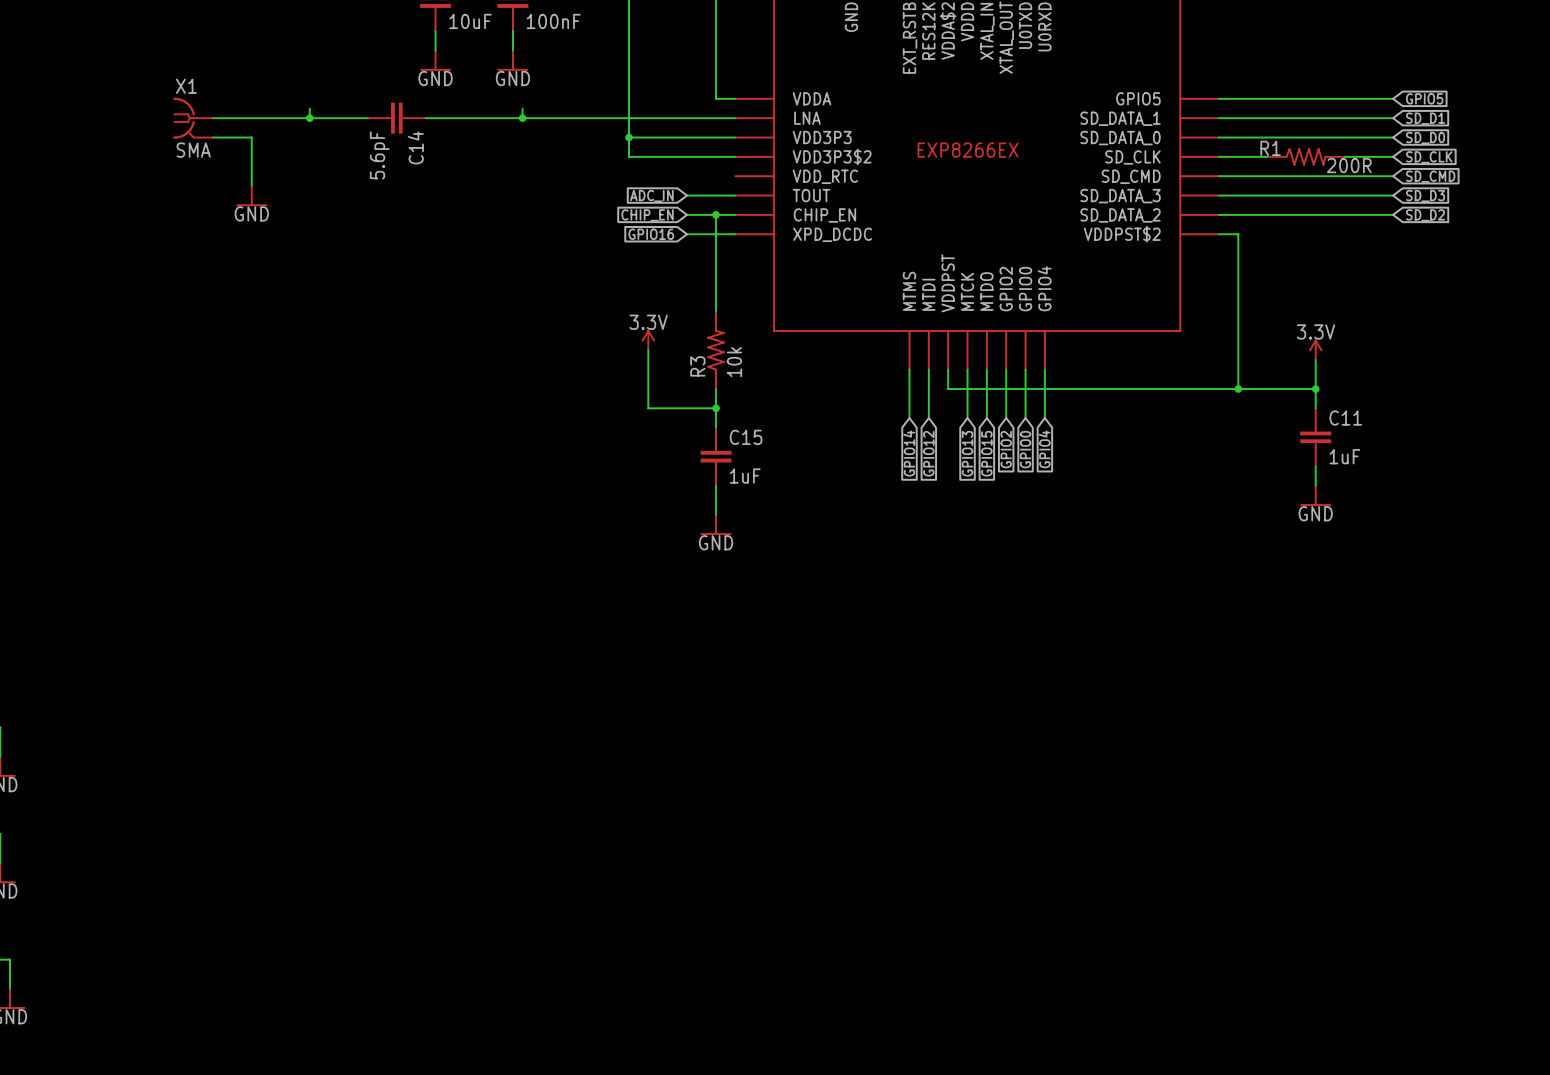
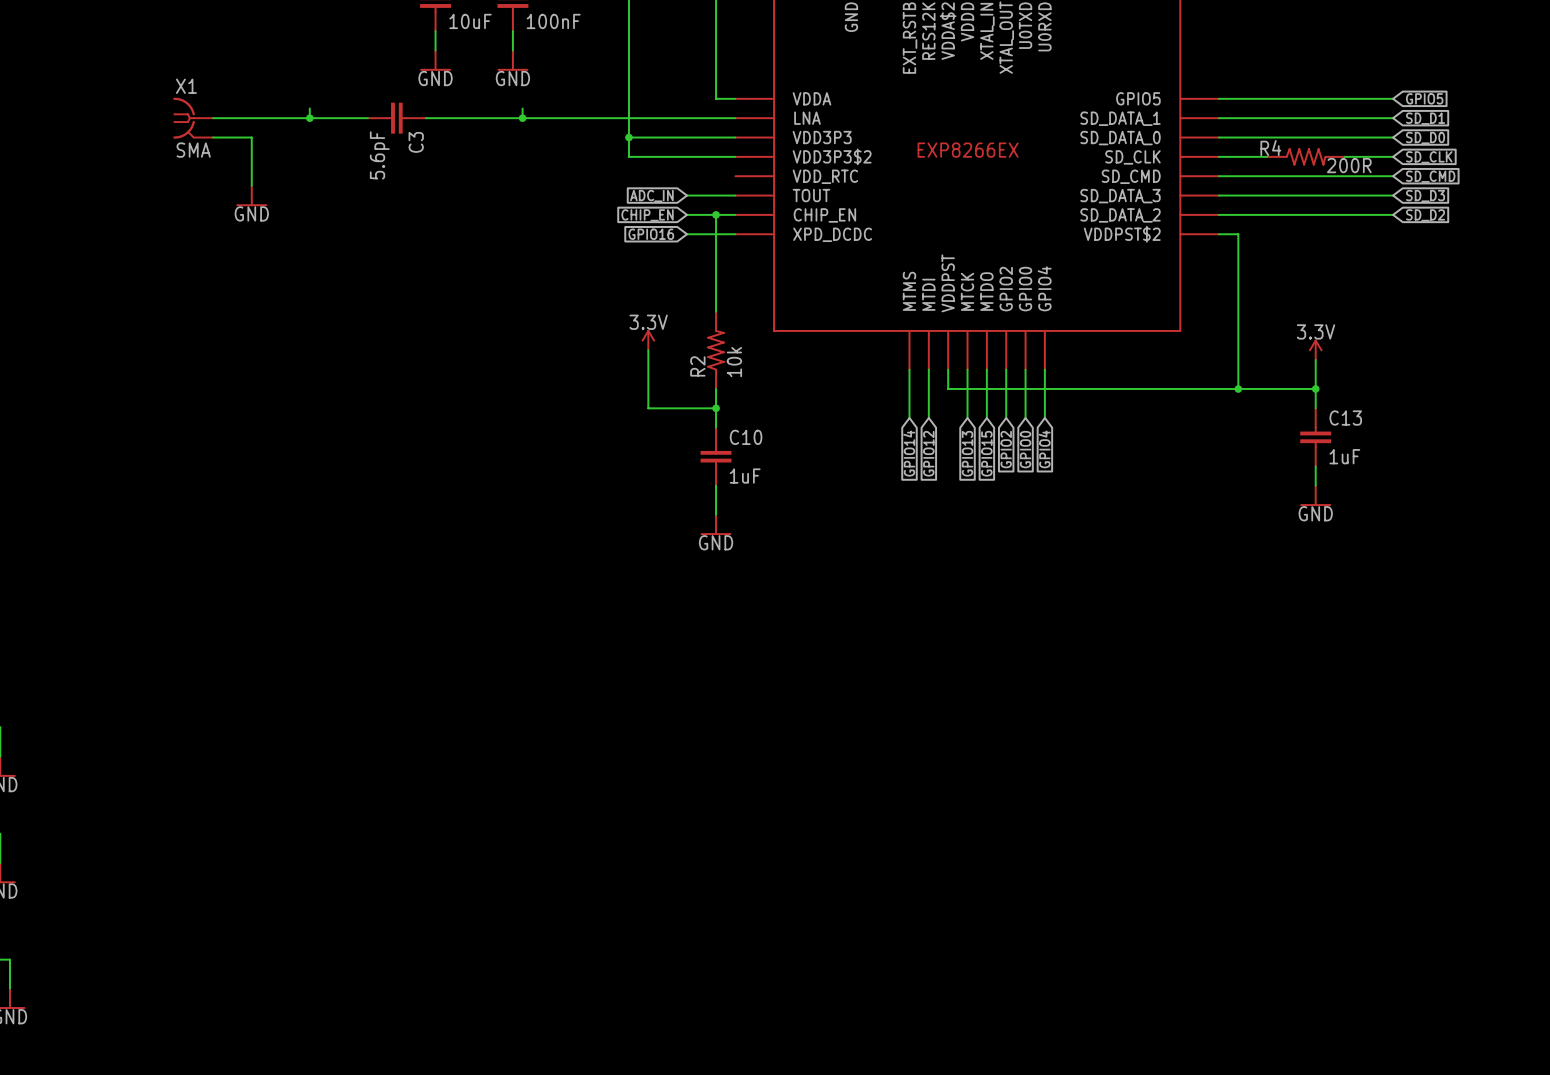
C14 name: C14 (415, 147) -> C3 (416, 142)
R1 name: R1 (1270, 148) -> R4 (1270, 148)
R3 name: R3 (697, 366) -> R2 (697, 366)
C11 name: C11 (1345, 418) -> C13 (1345, 418)
C15 name: C15 (746, 437) -> C10 (746, 437)

